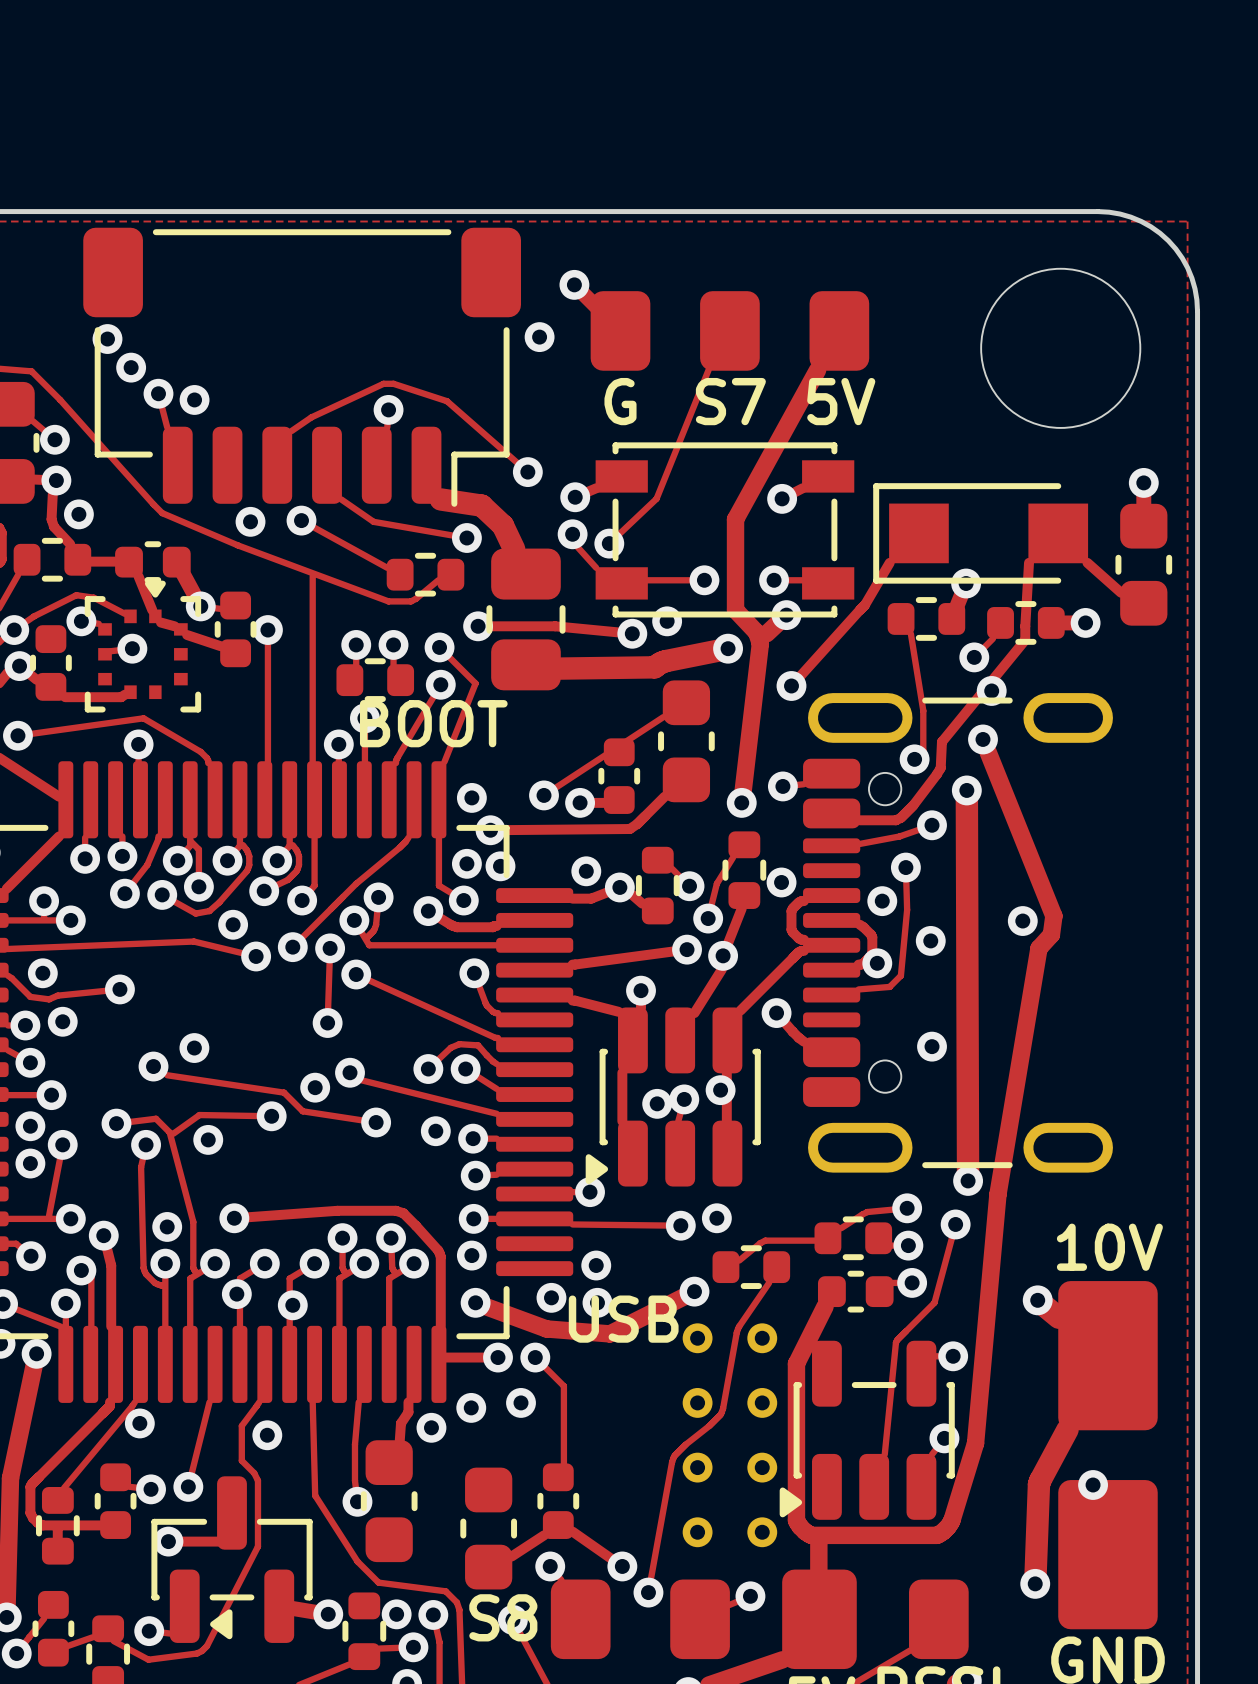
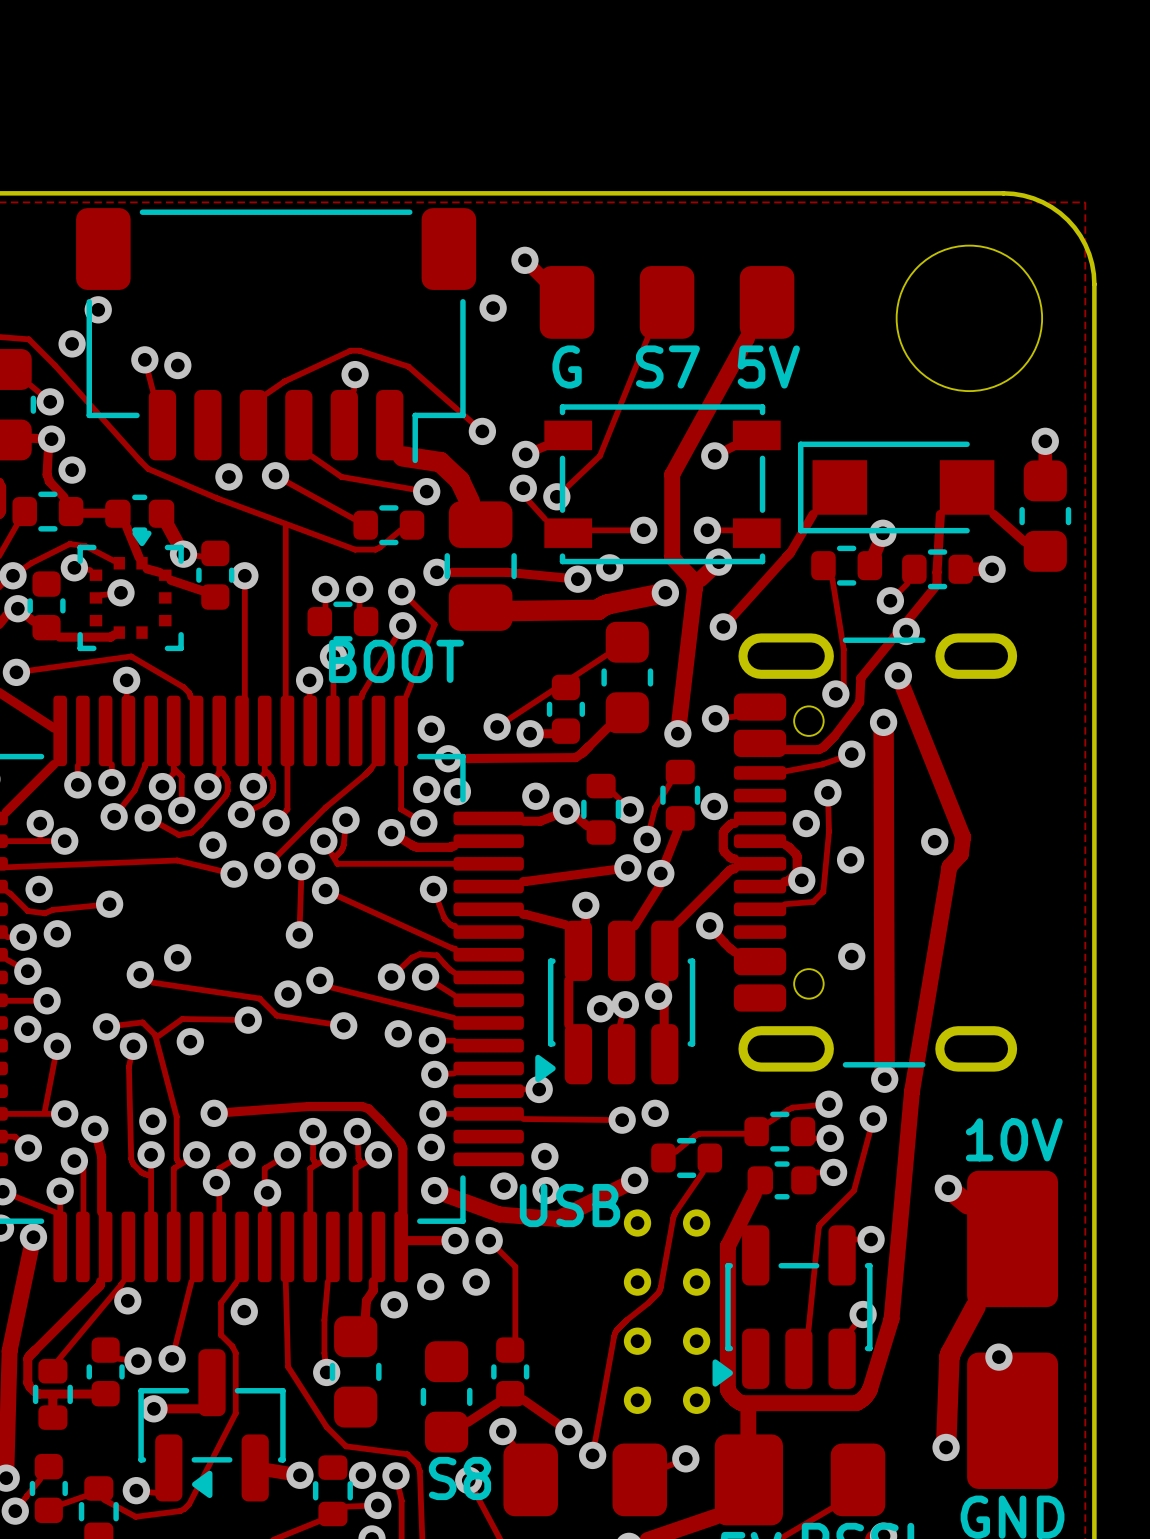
via position: (131, 367) -> (72, 343)
via: (30, 1163) -> none

